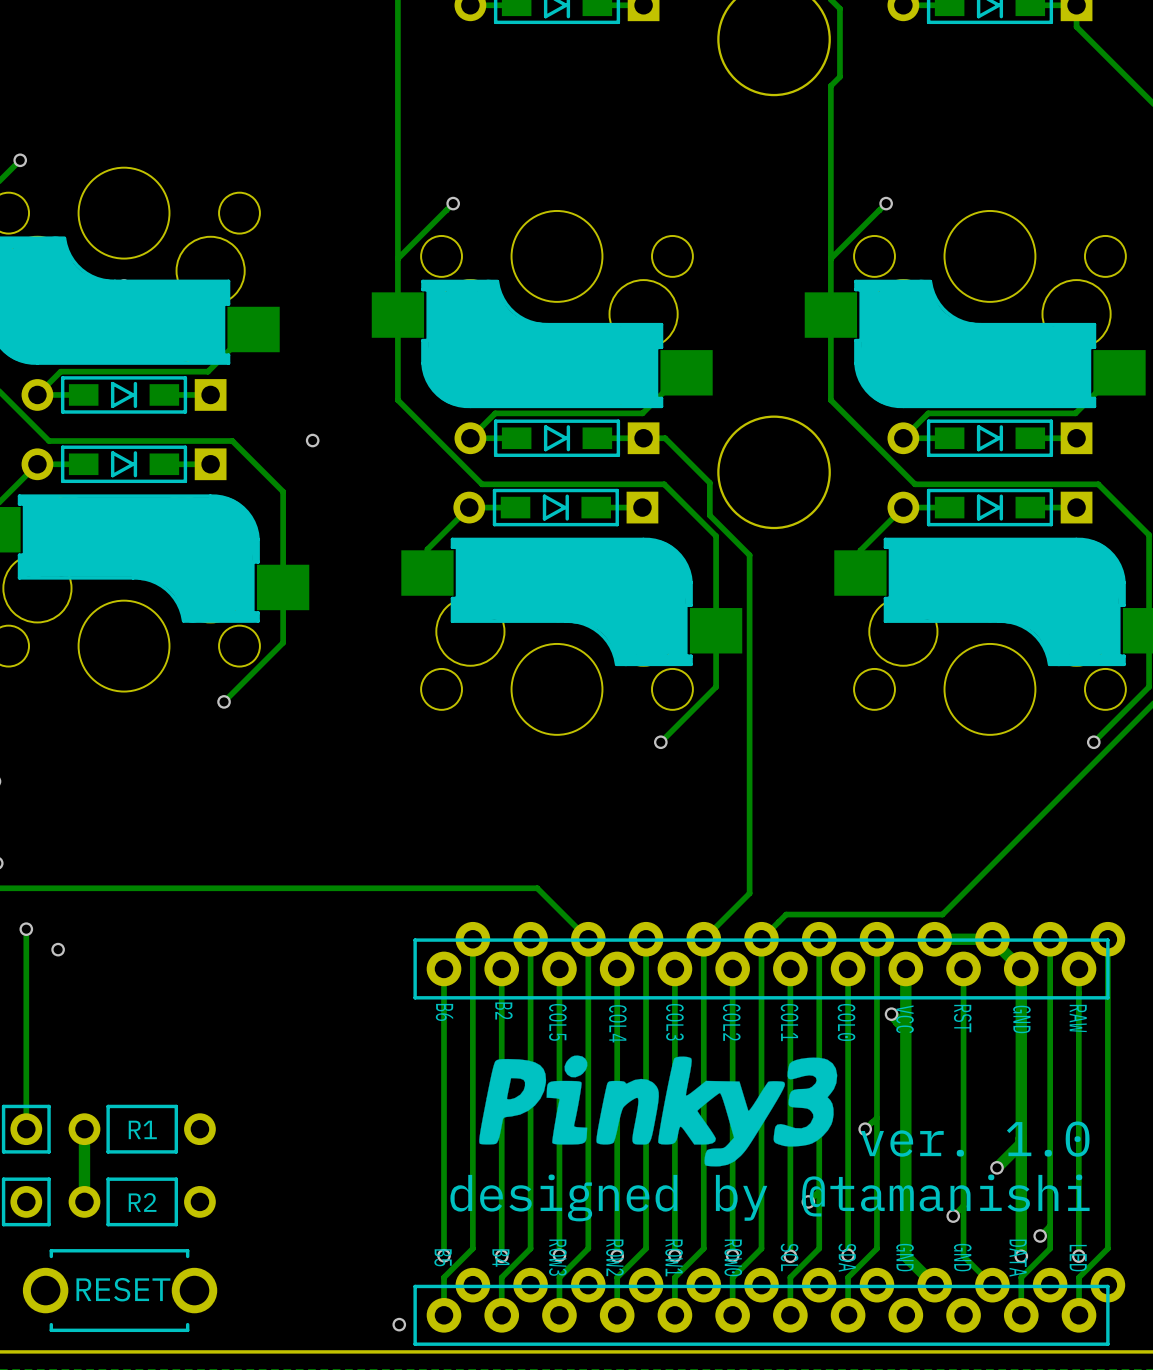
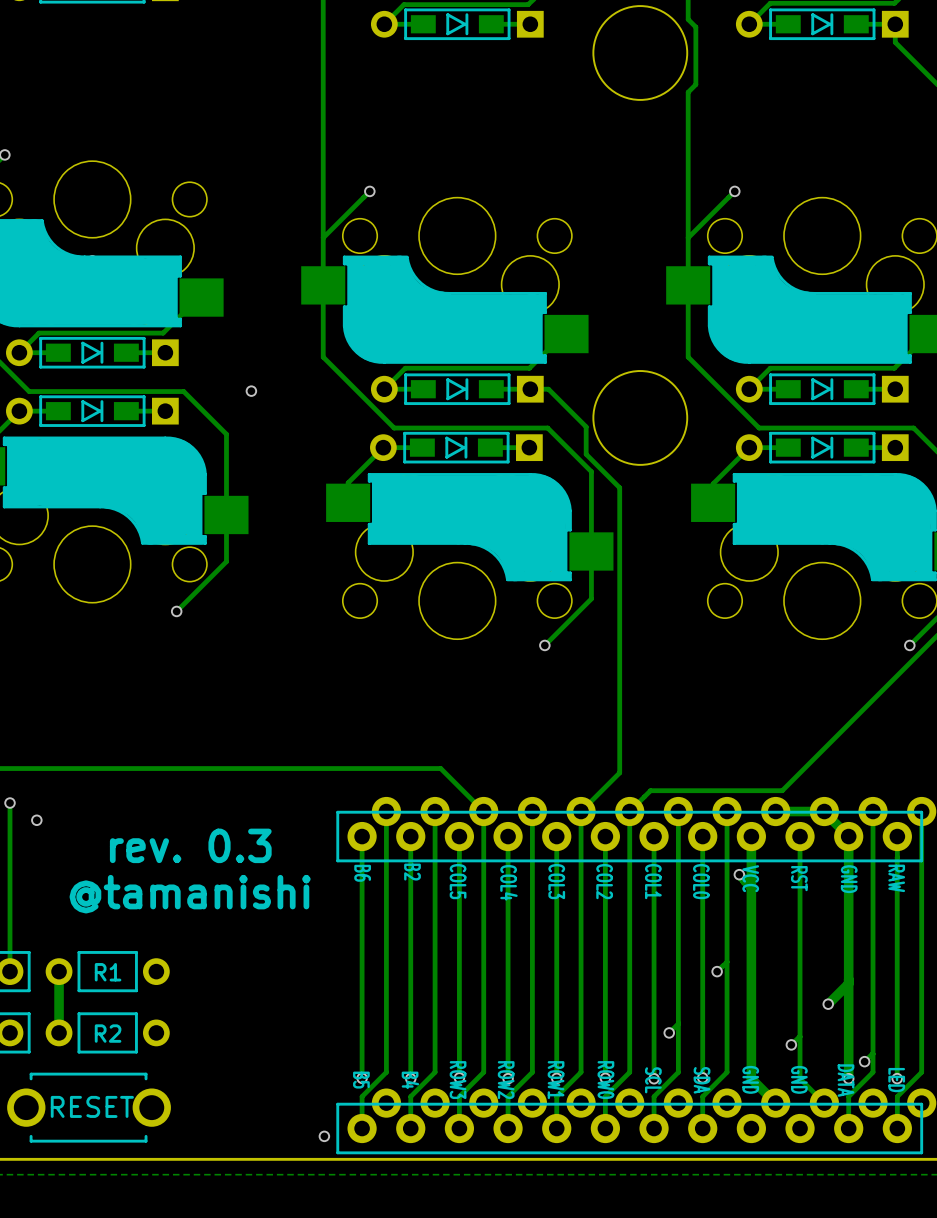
text: none -> rev. 0.3 (190, 845)
text: none -> @tamanishi (190, 894)
drawing: [479, 1055, 838, 1167] -> none
text: ver. 1.0 (975, 1139) -> none
text: designed by @tamanishi (770, 1197) -> none

